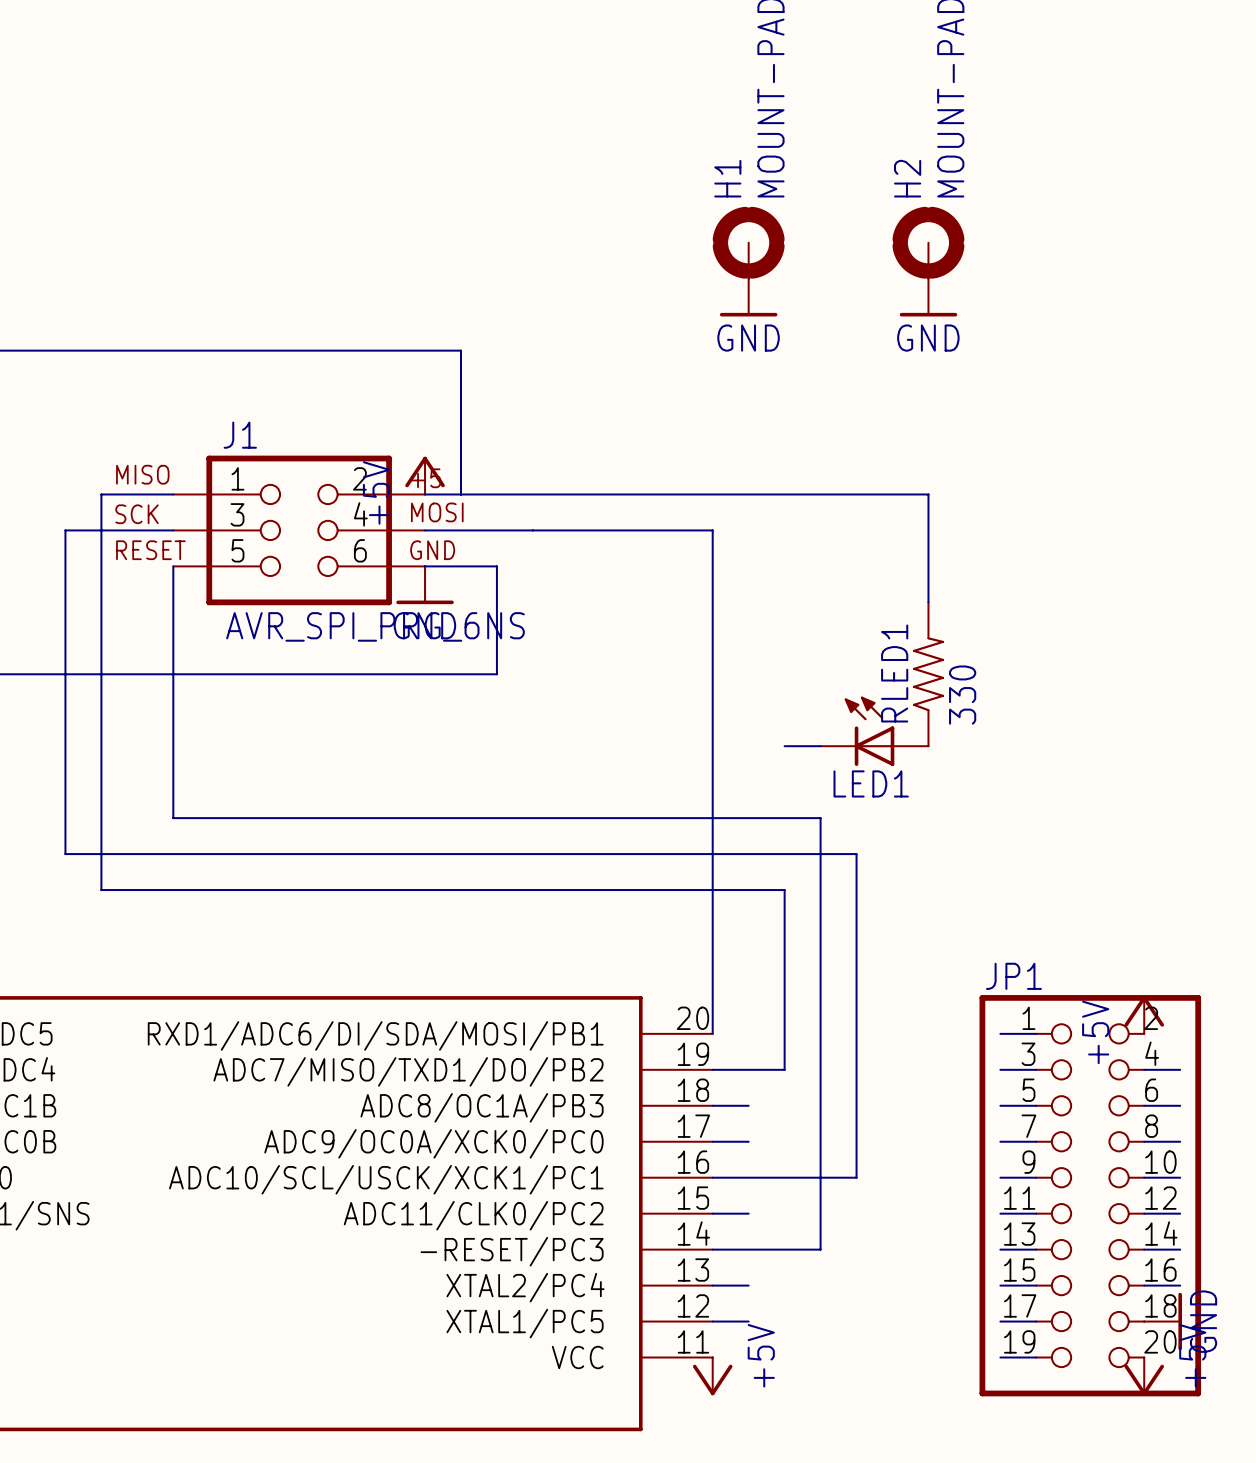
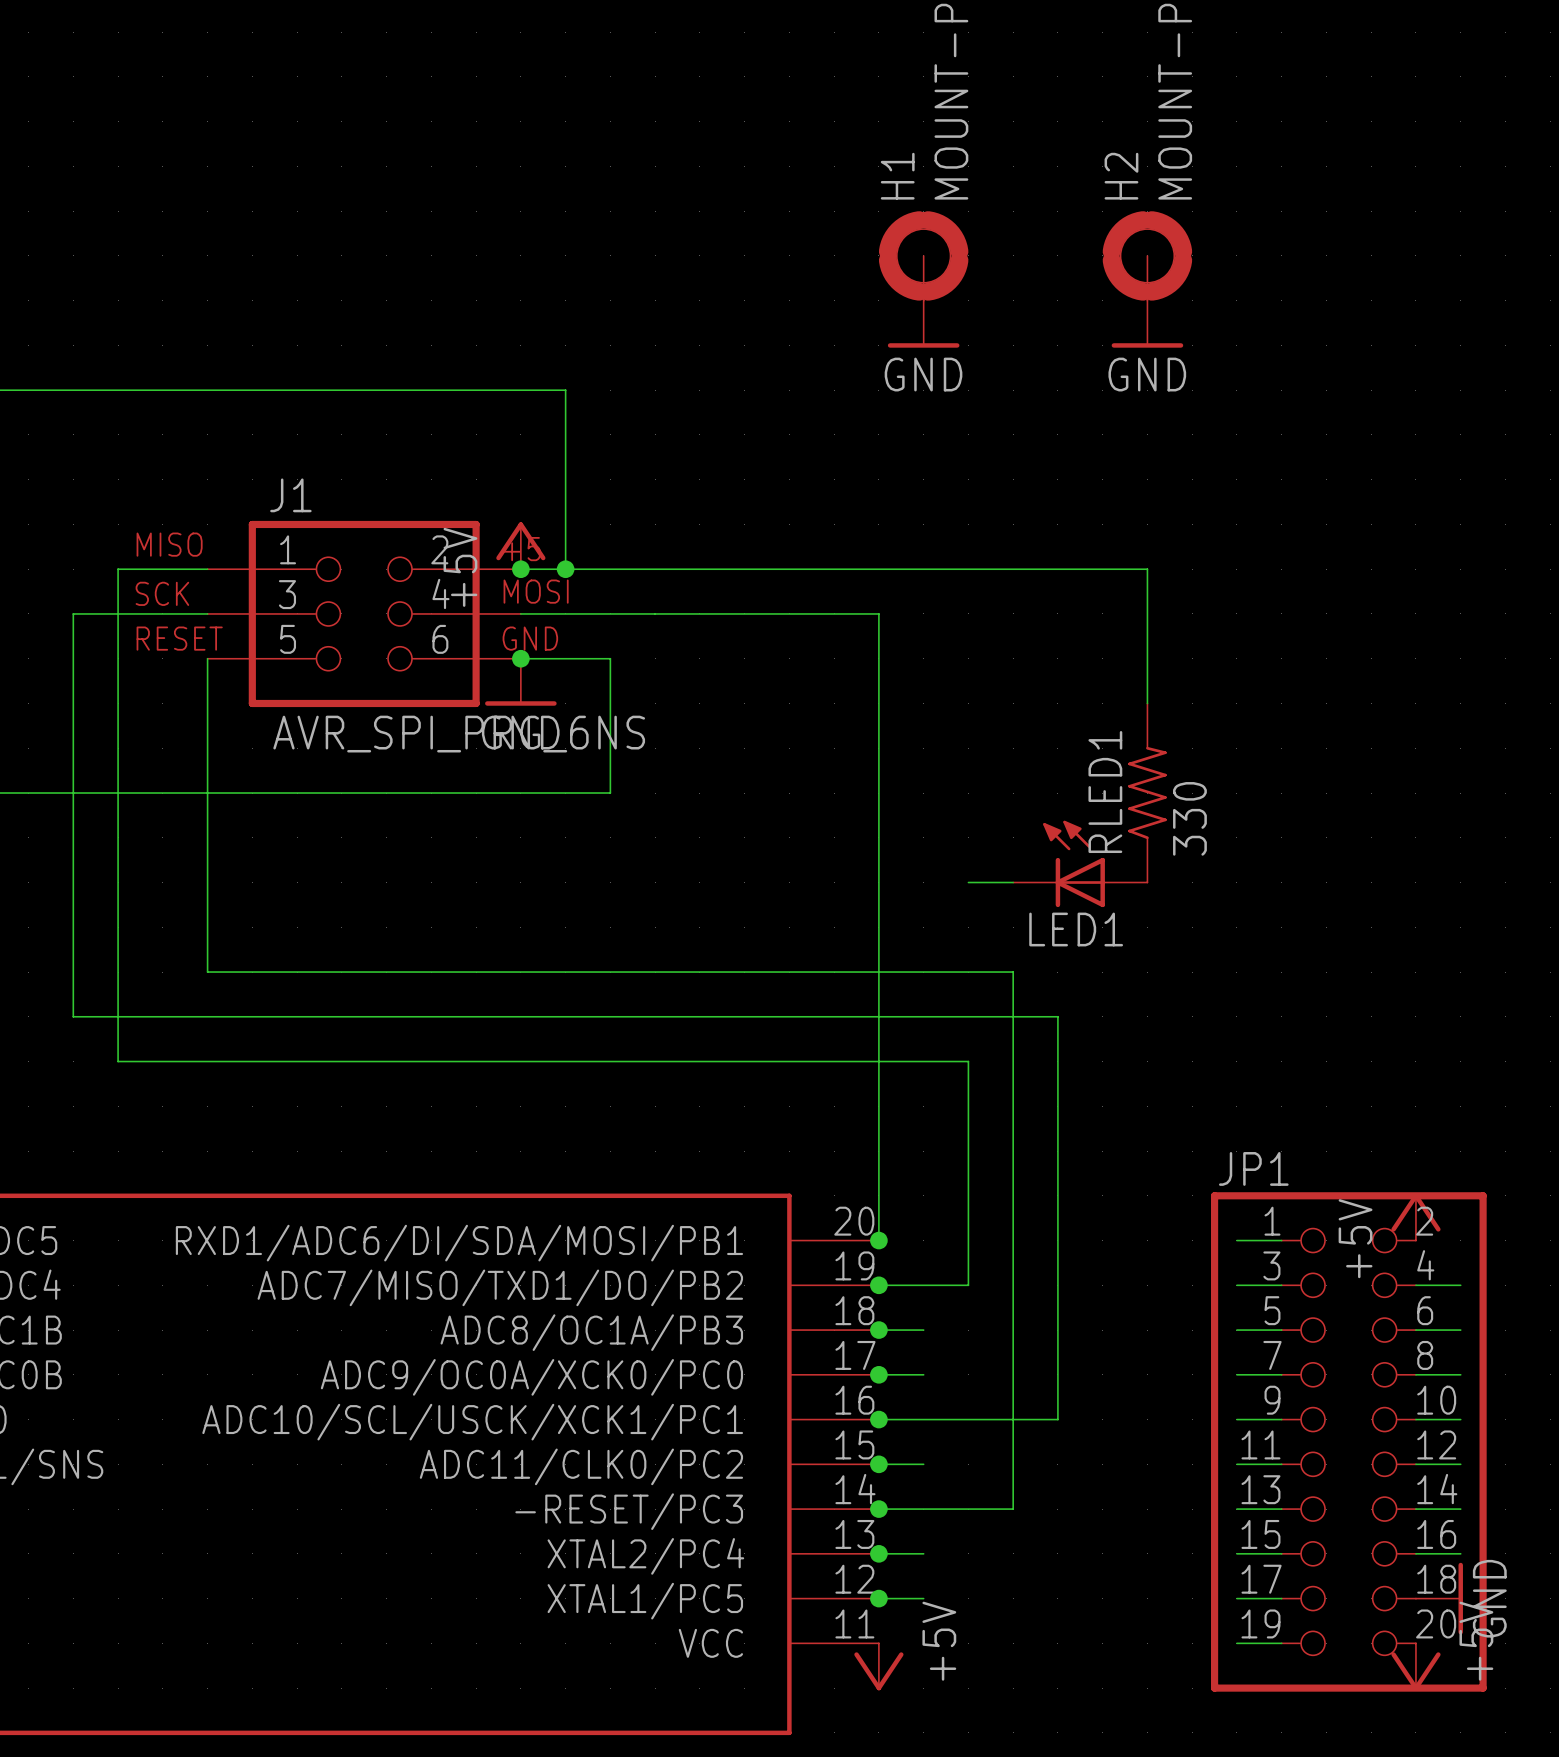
junction: none -> (520, 569)
junction: none -> (565, 569)
junction: none -> (520, 658)
junction: none -> (878, 1240)
junction: none -> (878, 1285)
junction: none -> (878, 1330)
junction: none -> (878, 1374)
junction: none -> (878, 1419)
junction: none -> (878, 1464)
junction: none -> (878, 1509)
junction: none -> (878, 1553)
junction: none -> (878, 1598)

